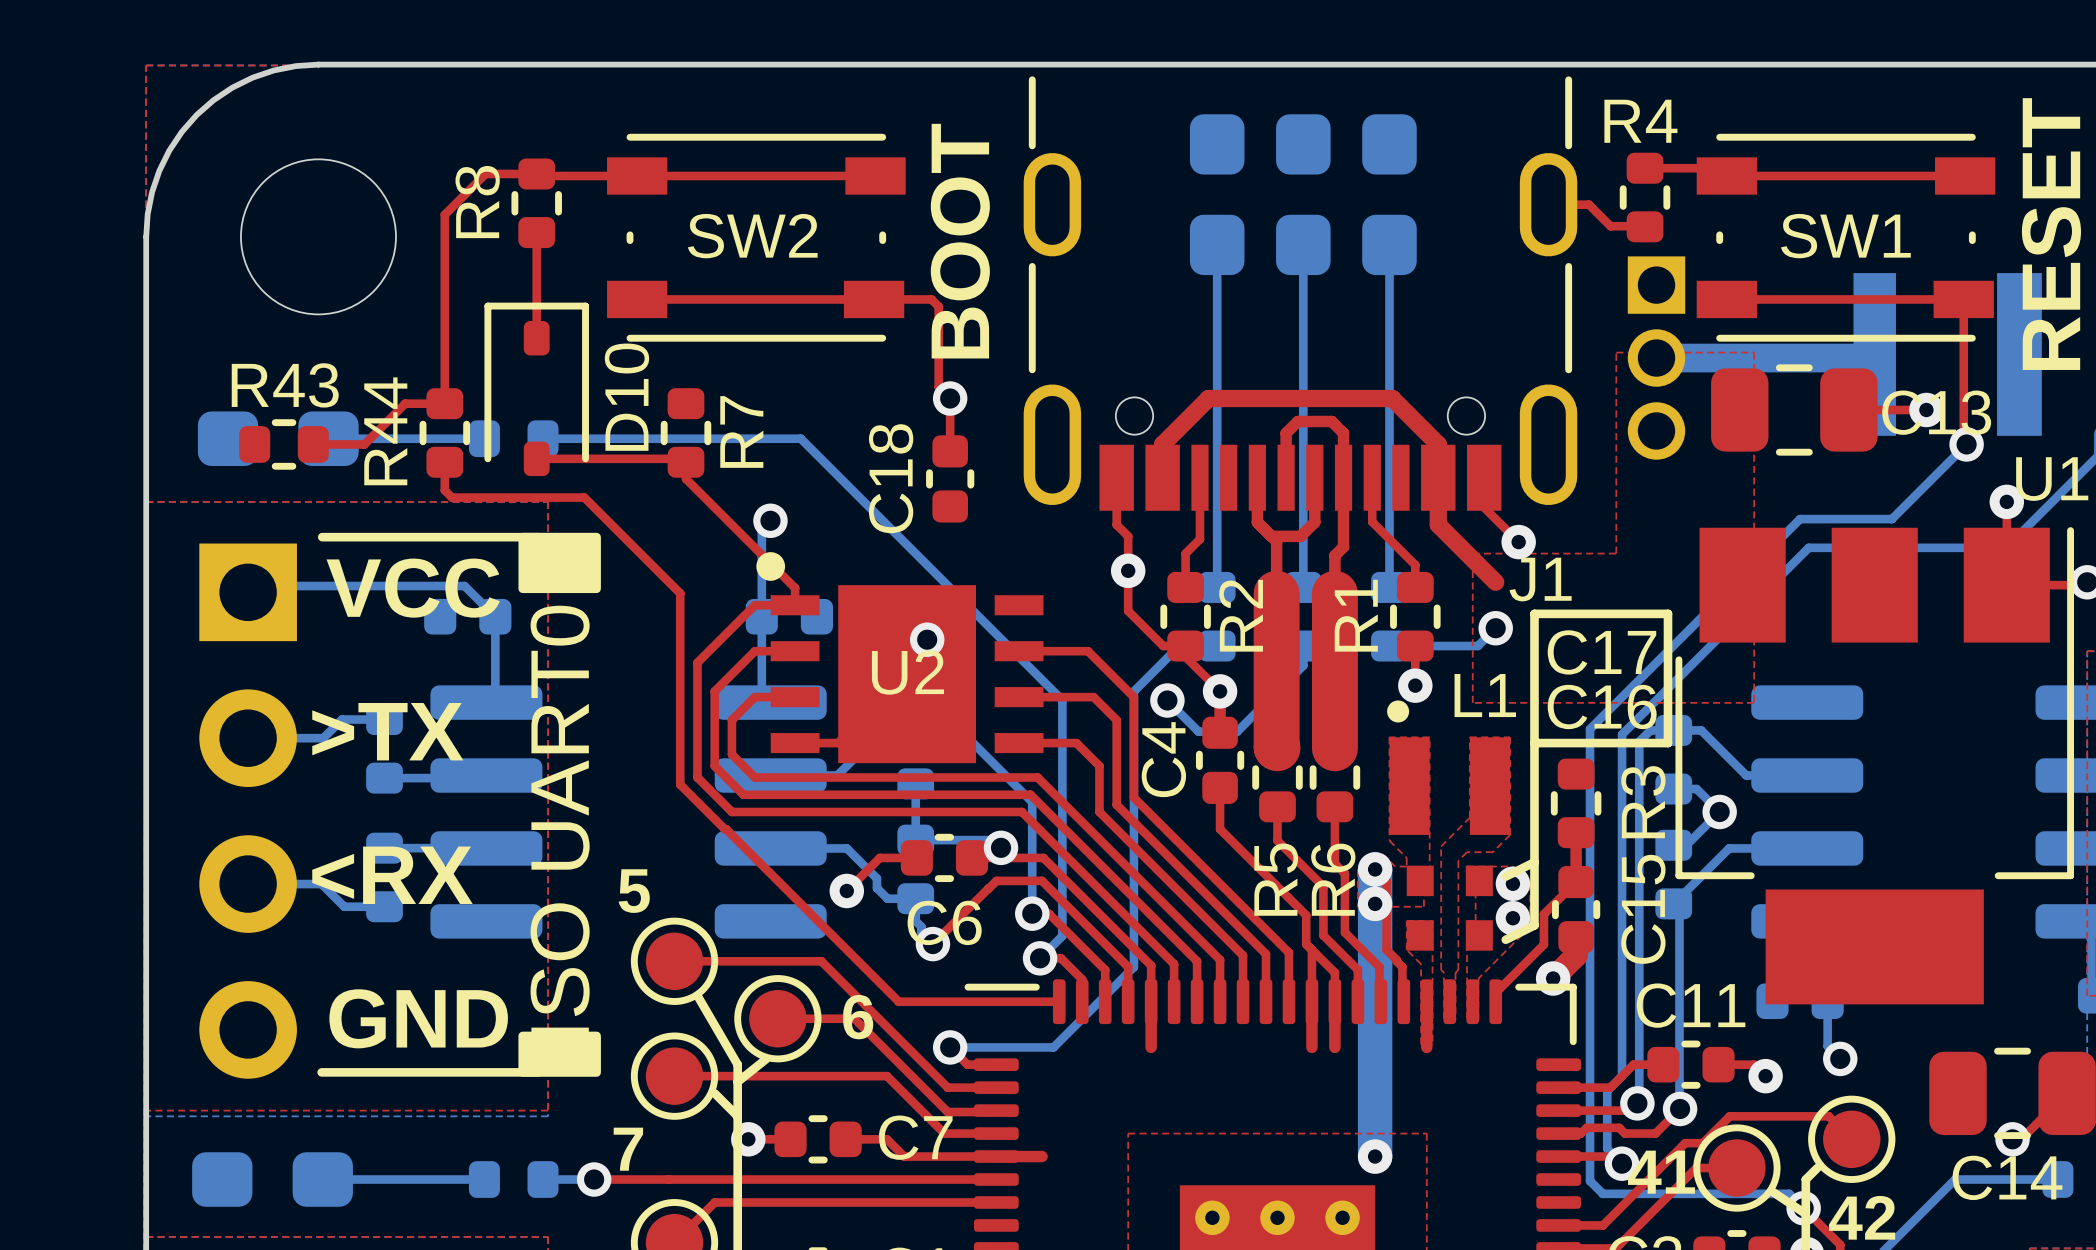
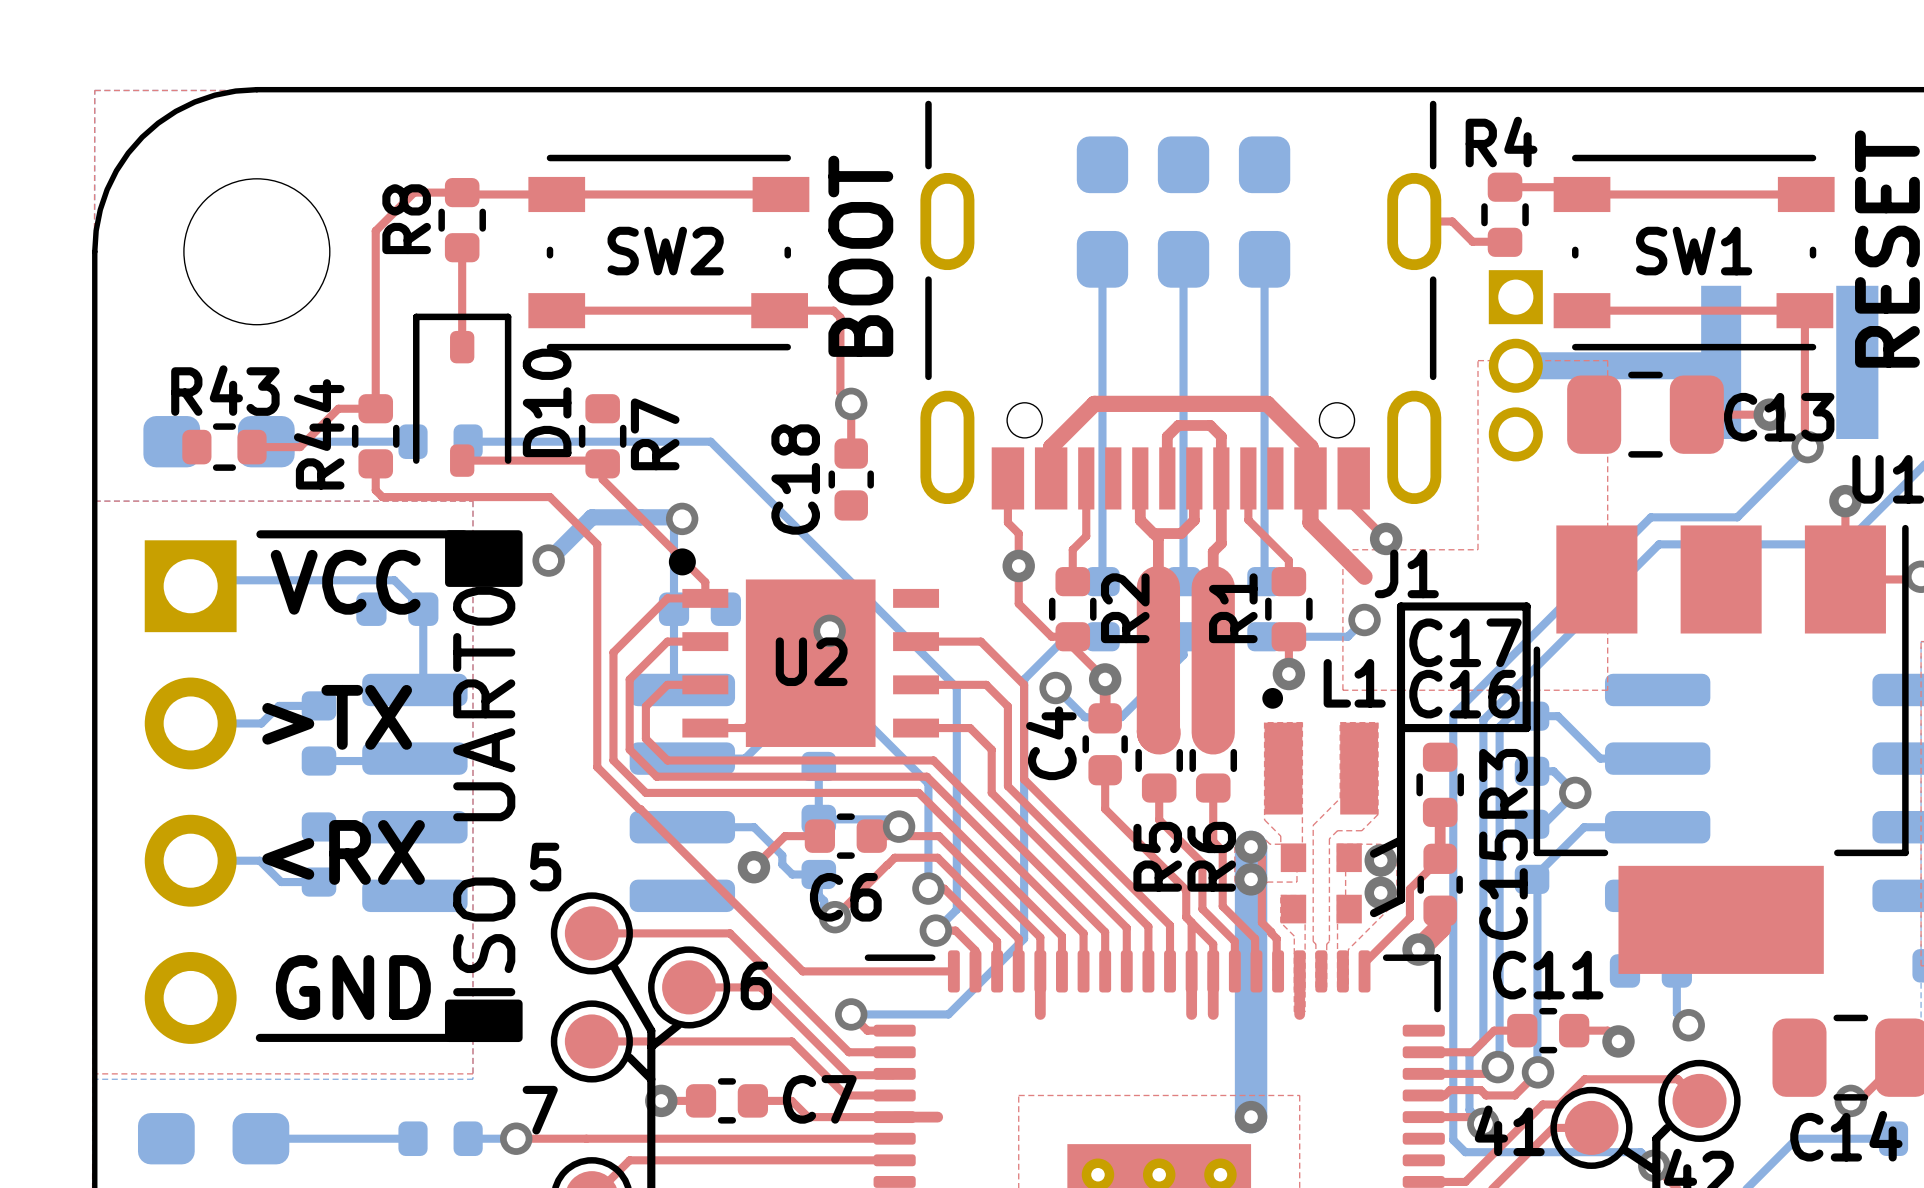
top track: (584, 497) (680, 593) -> (507, 497) (549, 497) (597, 544) (597, 587)
bottom track: none -> (682, 518) (680, 517) (591, 517) (548, 560)
via: none -> (548, 560)

